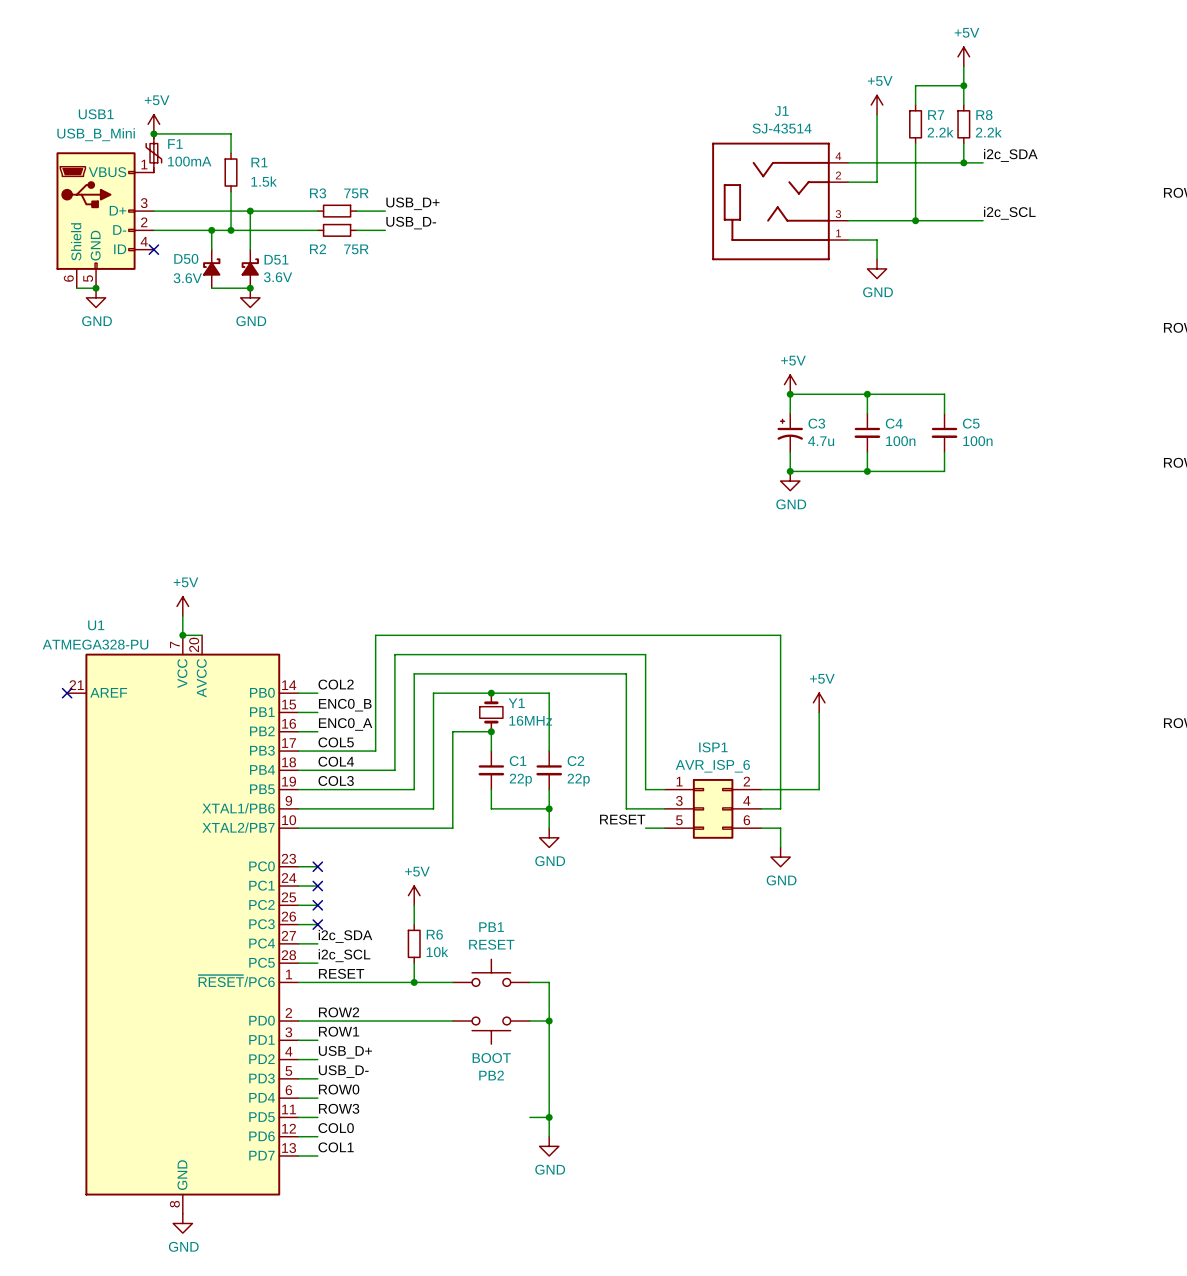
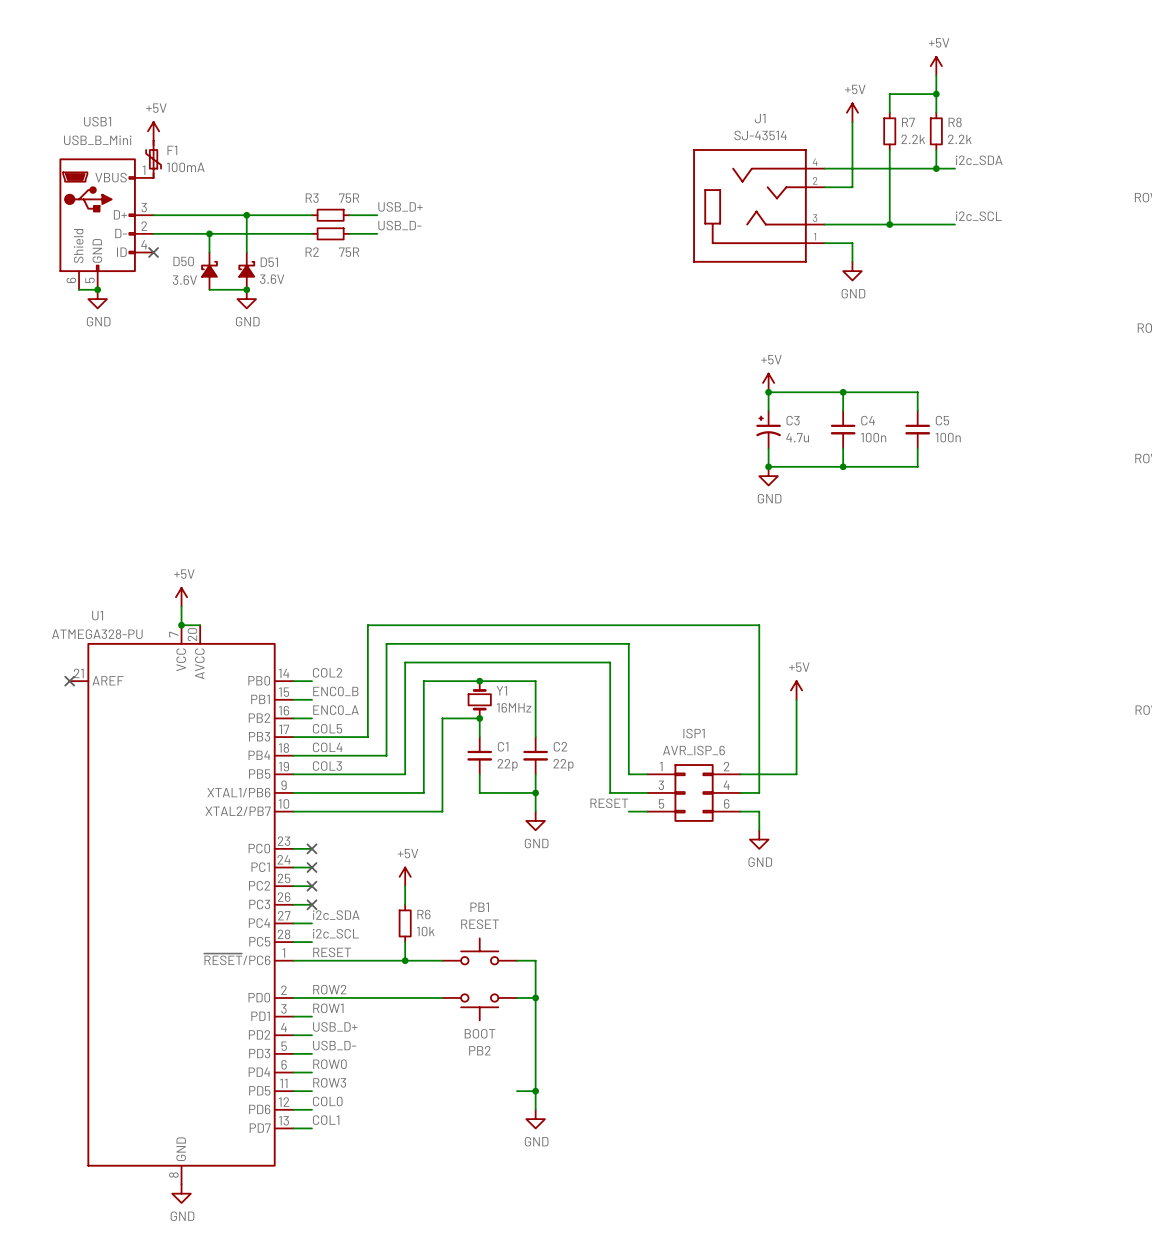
wire: (153, 133) (231, 133) (231, 153) -> none
junction: (153, 133) -> none
R1: 1.5k (231, 172) -> none
wire: (231, 191) (231, 230) -> none
junction: (231, 230) -> none

